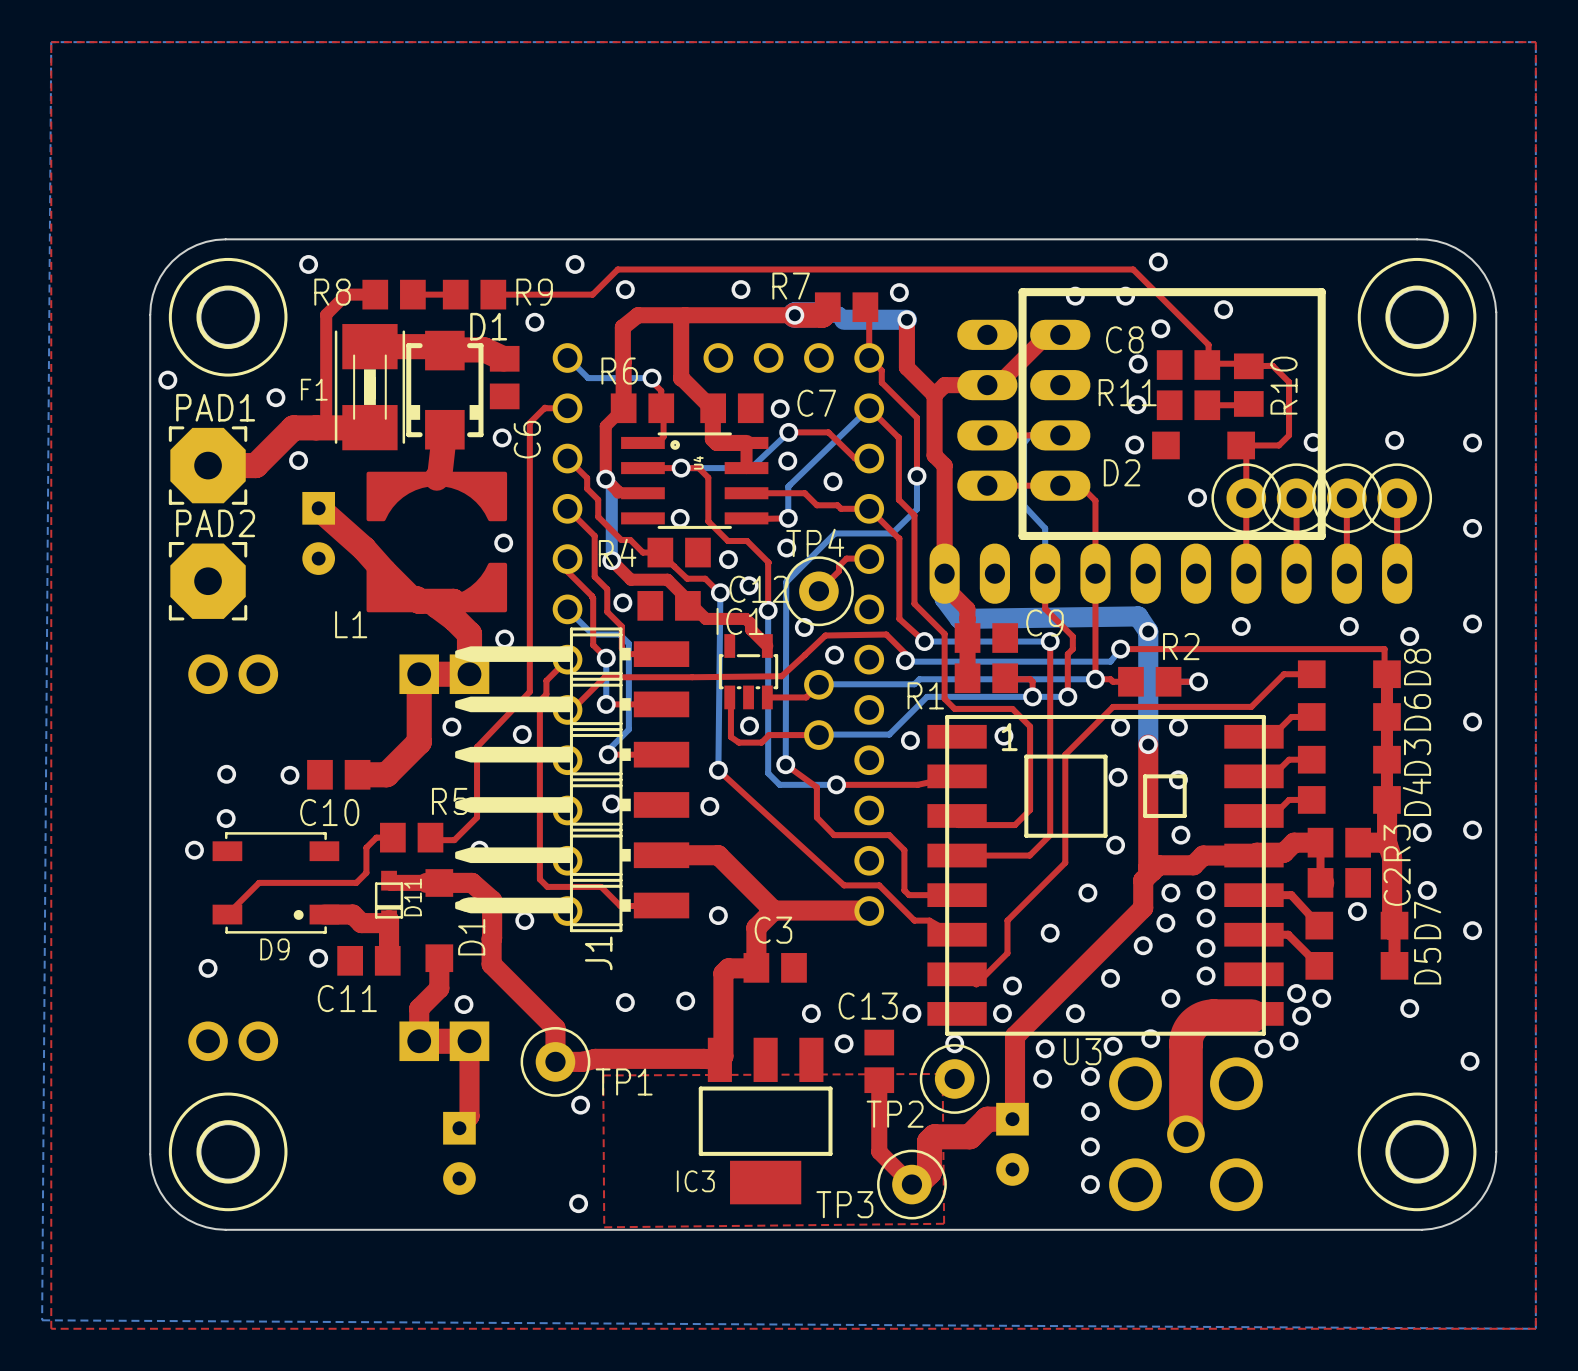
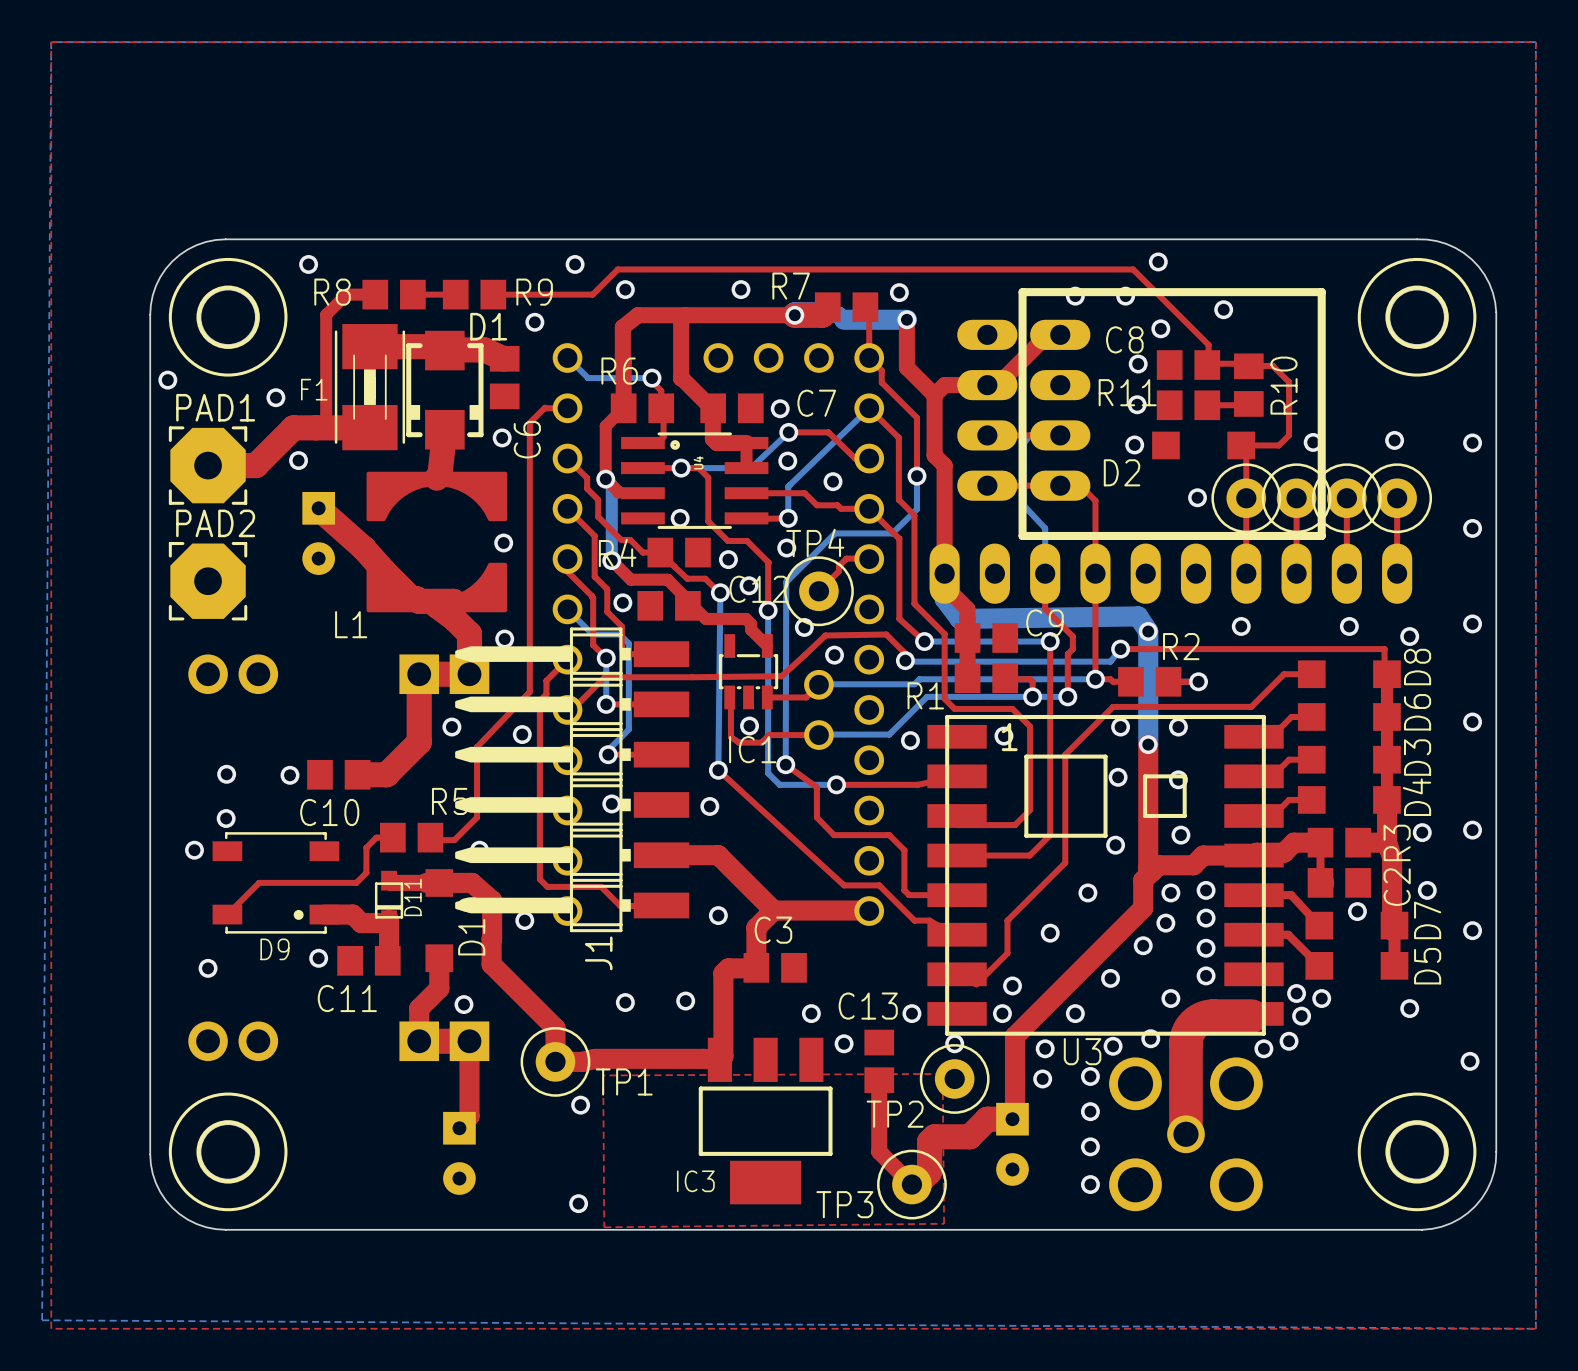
IC1 name position: IC1 (740, 621) -> IC1 (752, 749)

